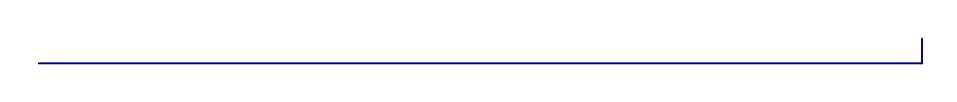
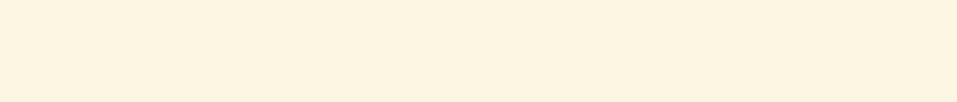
line: (922, 38) (922, 63) (38, 63) -> none

